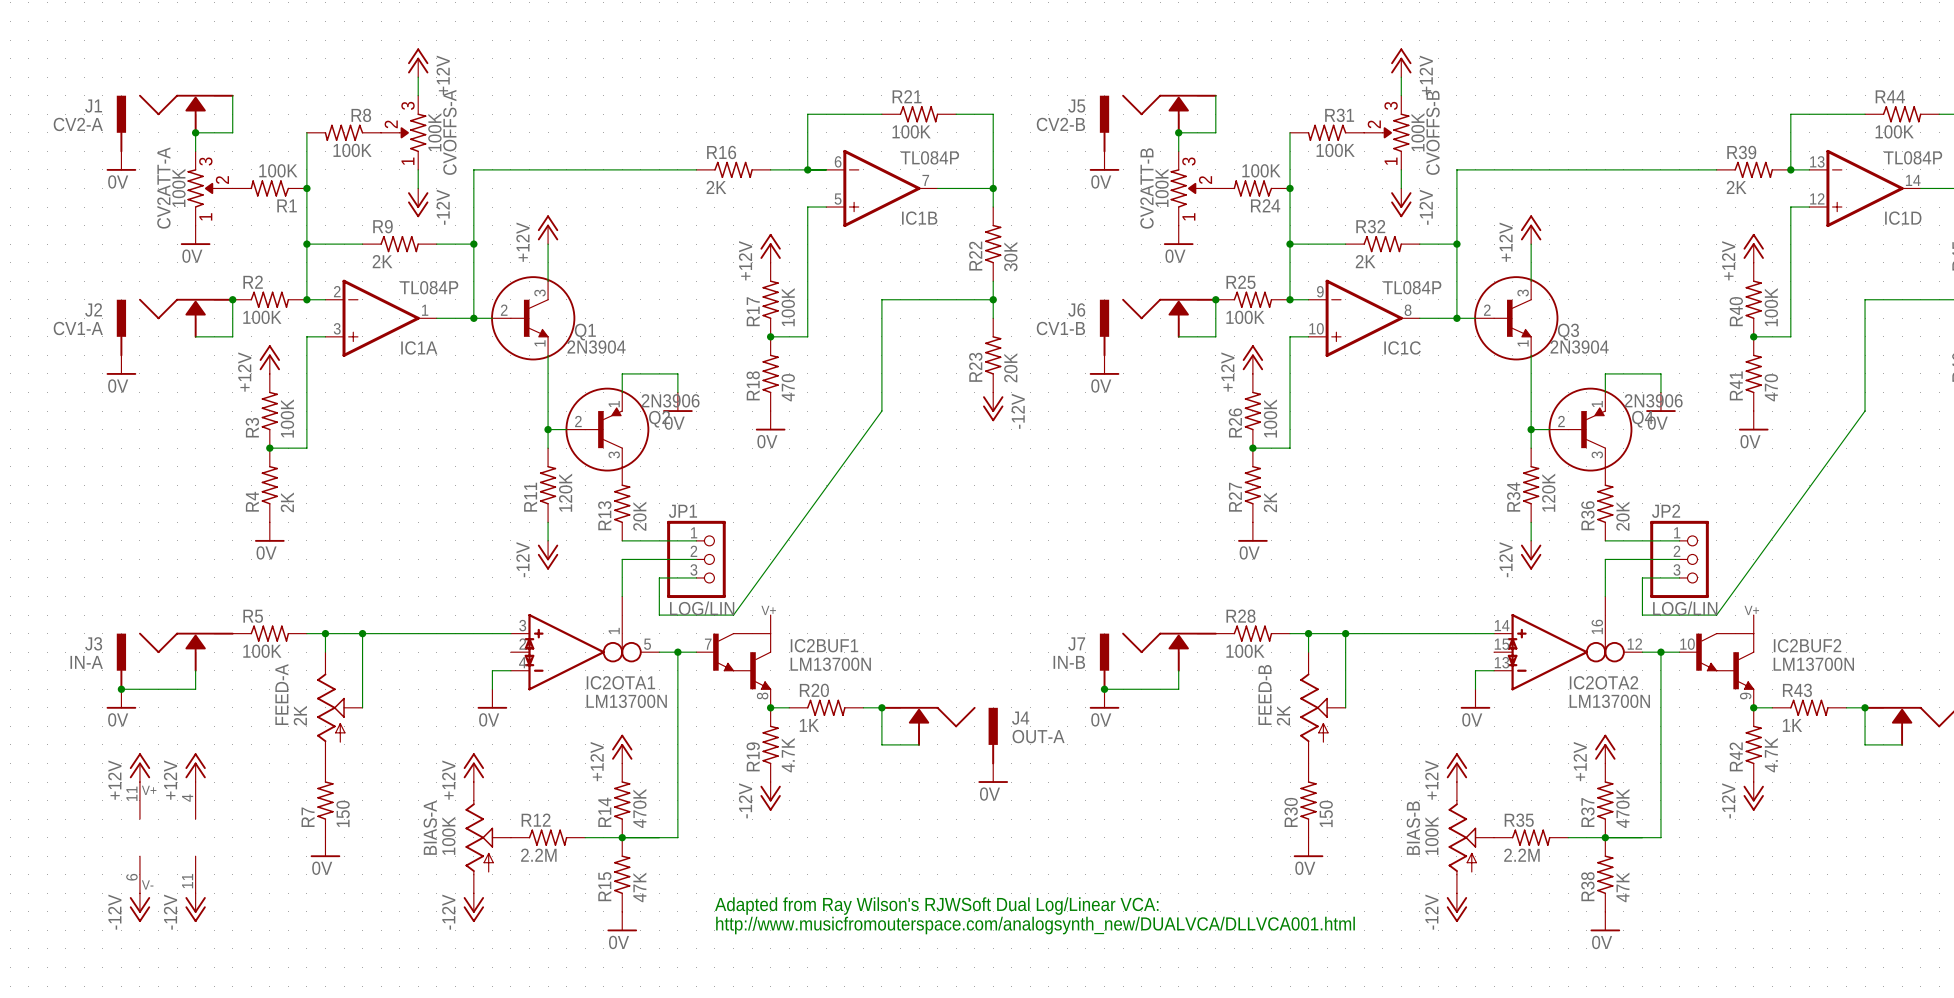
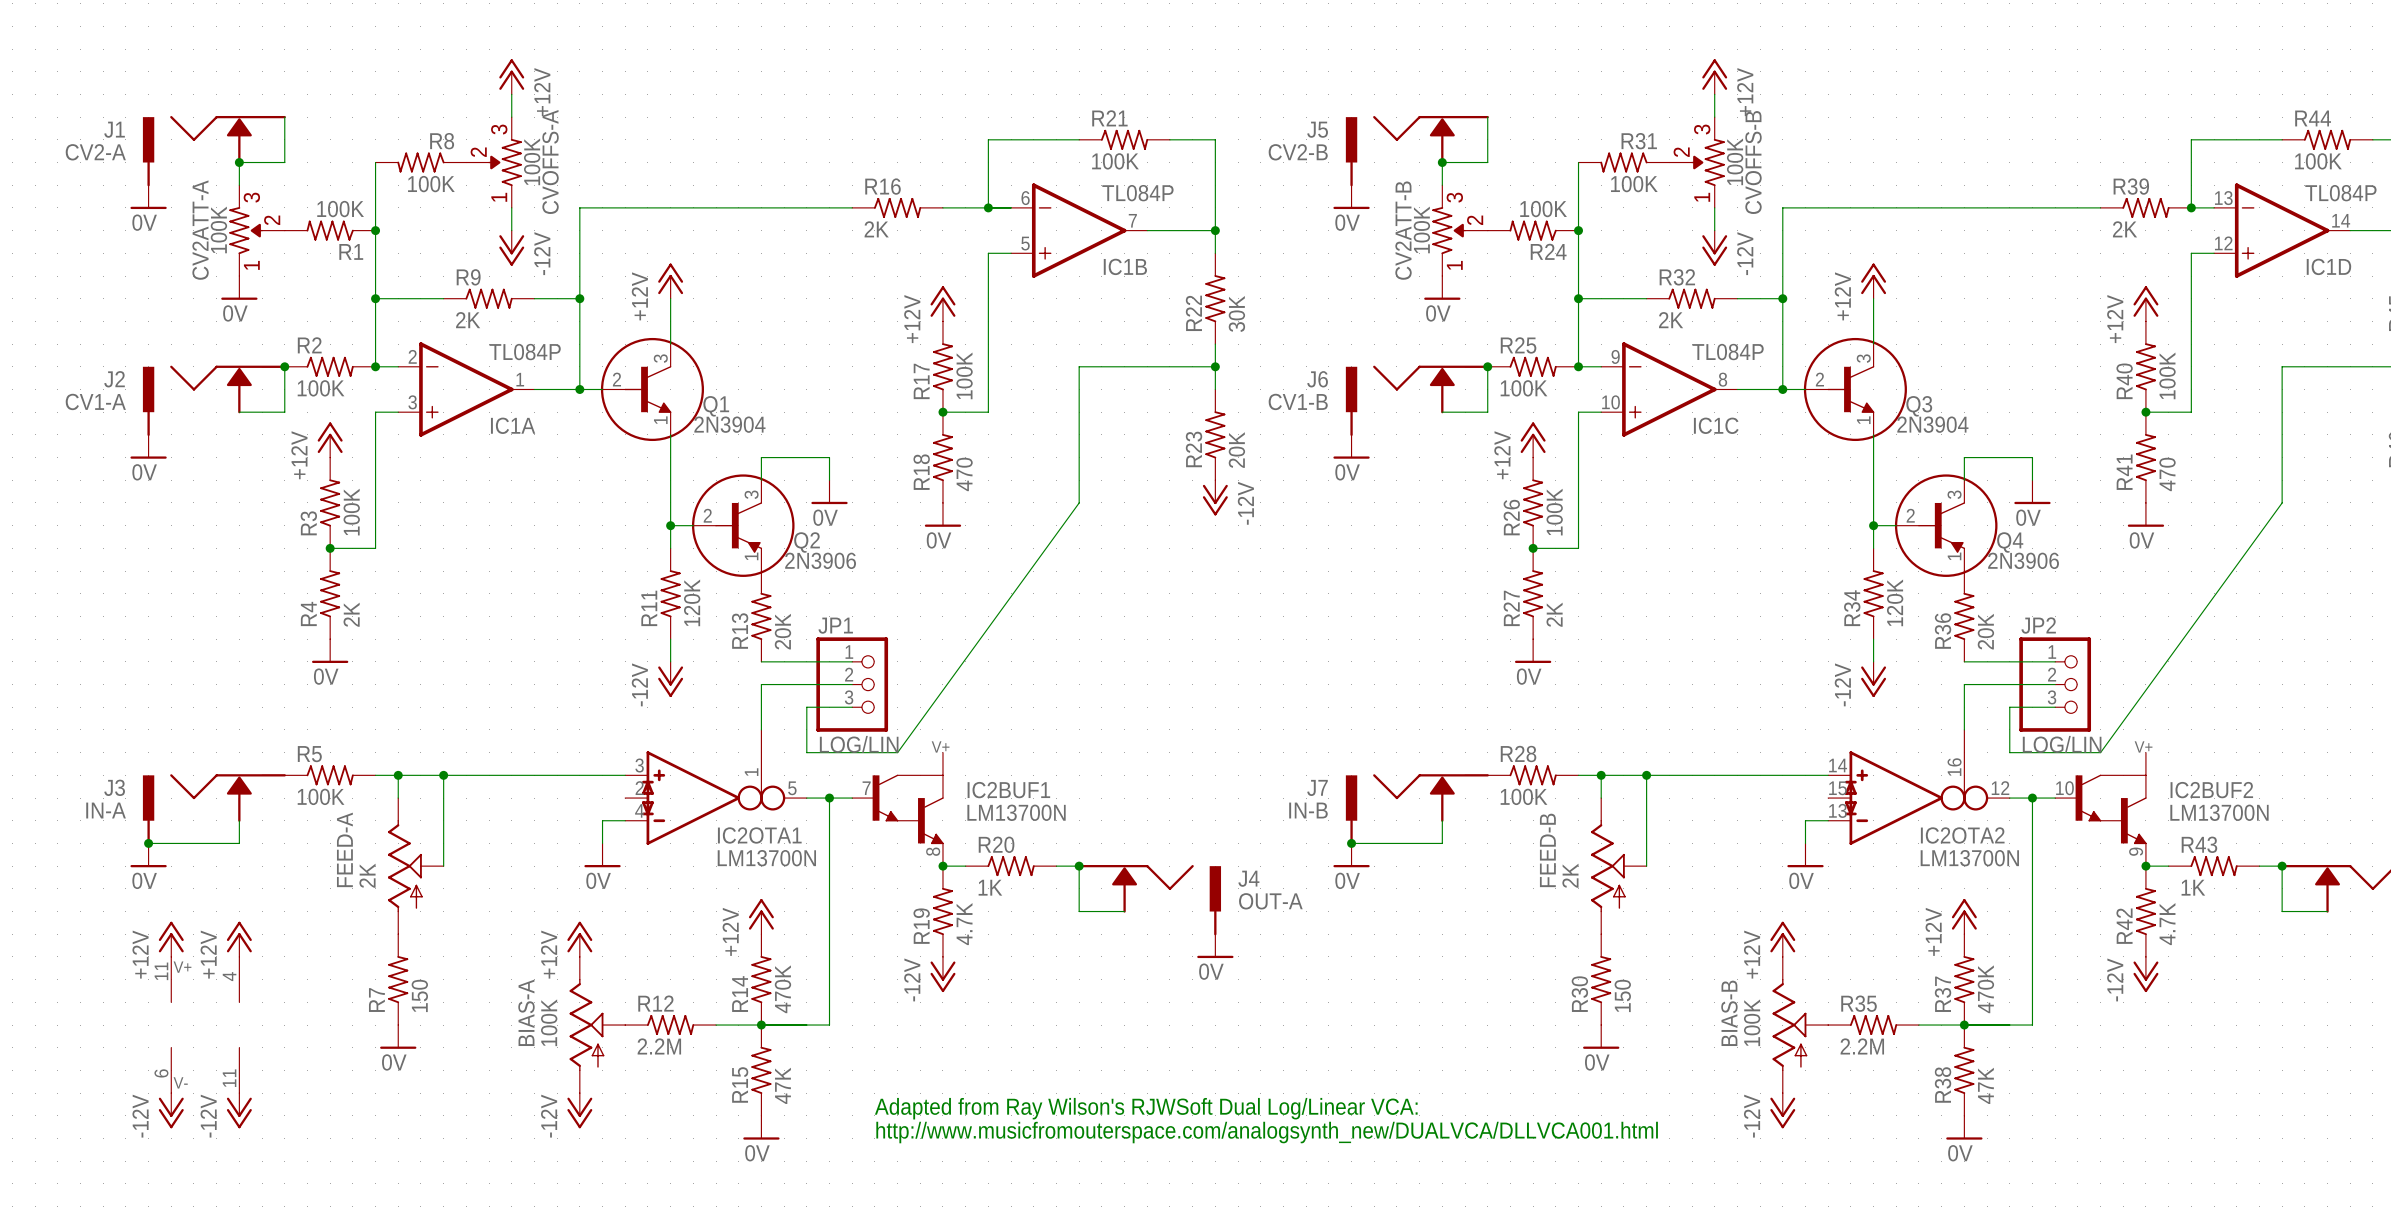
Q2 flip: as is (607, 429) -> up-down (743, 525)
Q4 flip: as is (1590, 429) -> up-down (1946, 525)

